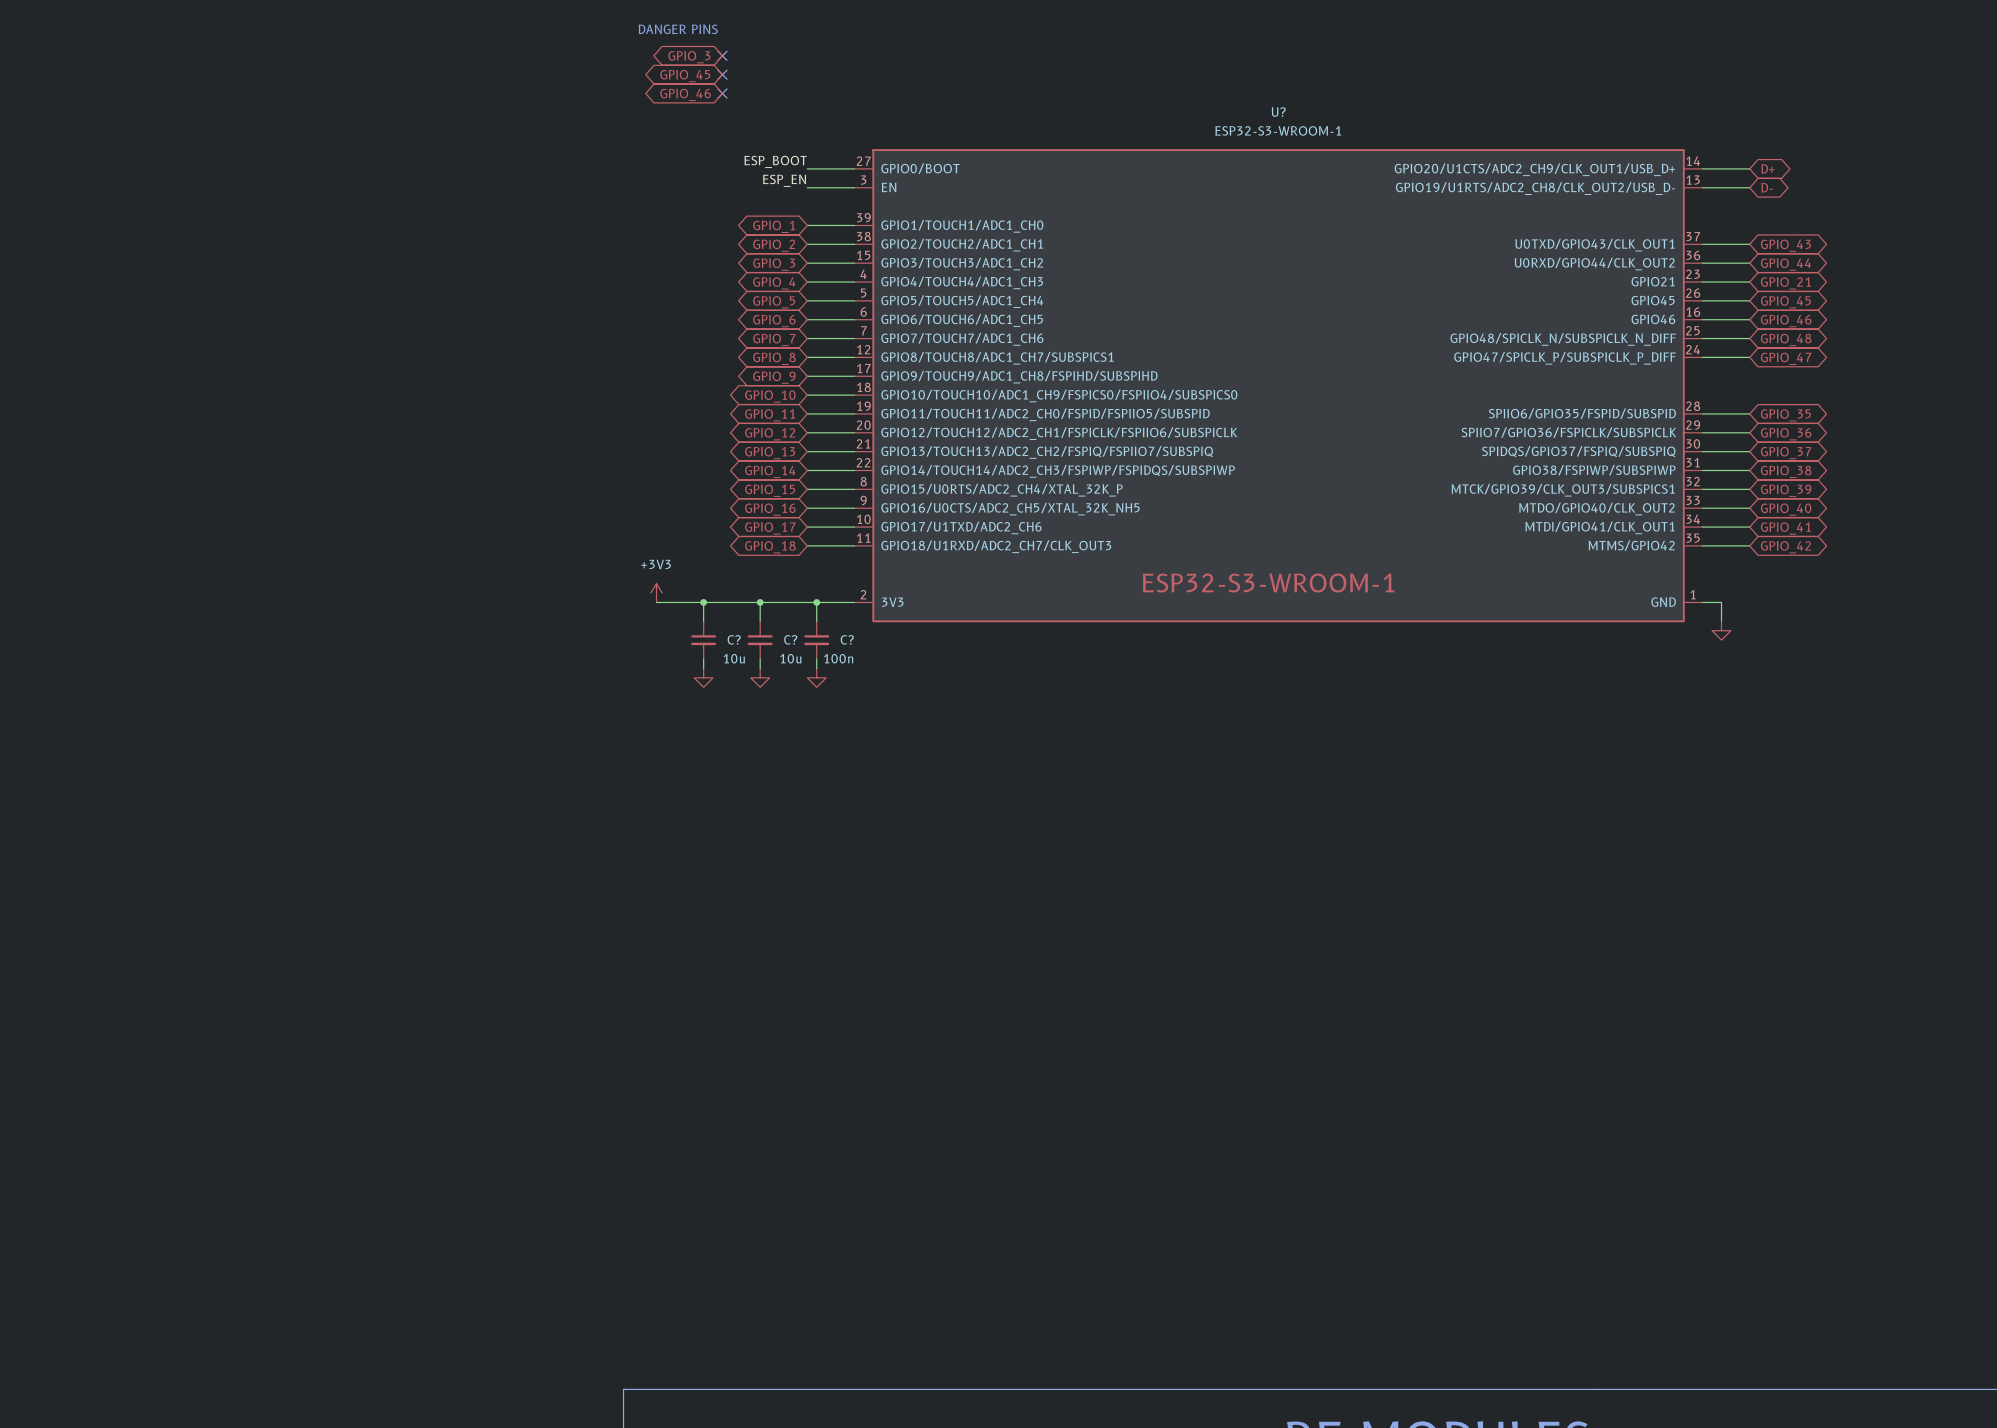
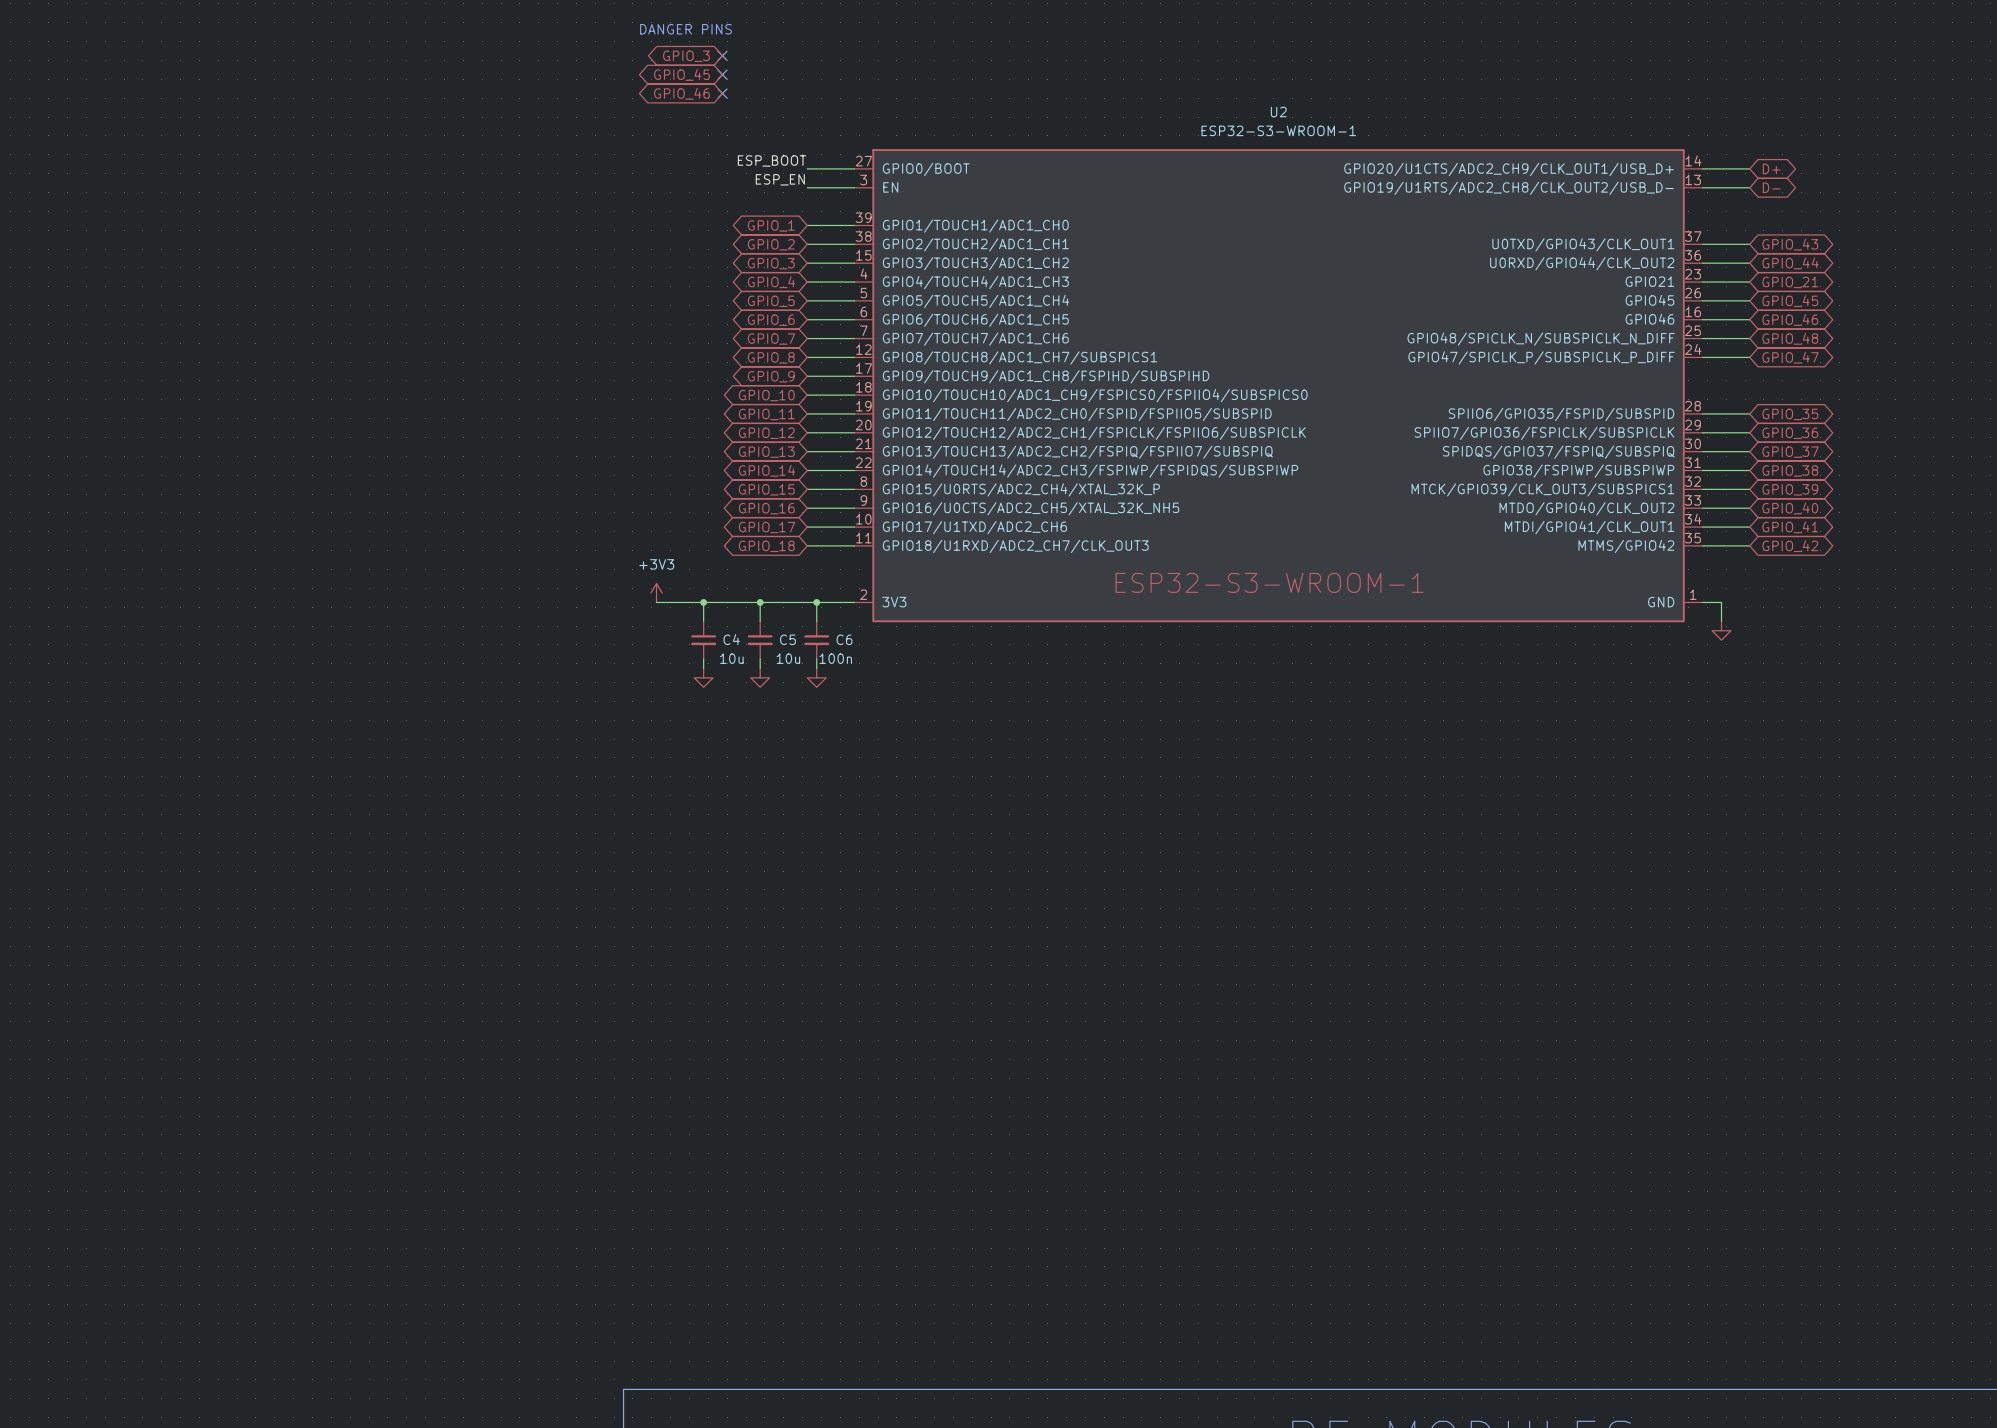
U? name: U? (1278, 112) -> U2 (1278, 112)
C? name: C? (734, 639) -> C4 (731, 639)
C? name: C? (790, 639) -> C5 (787, 639)
C? name: C? (847, 639) -> C6 (844, 639)

